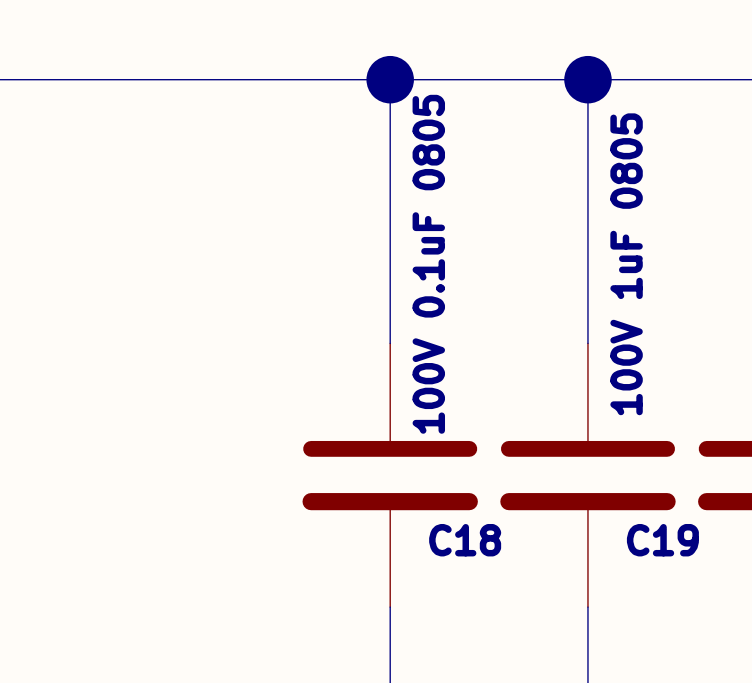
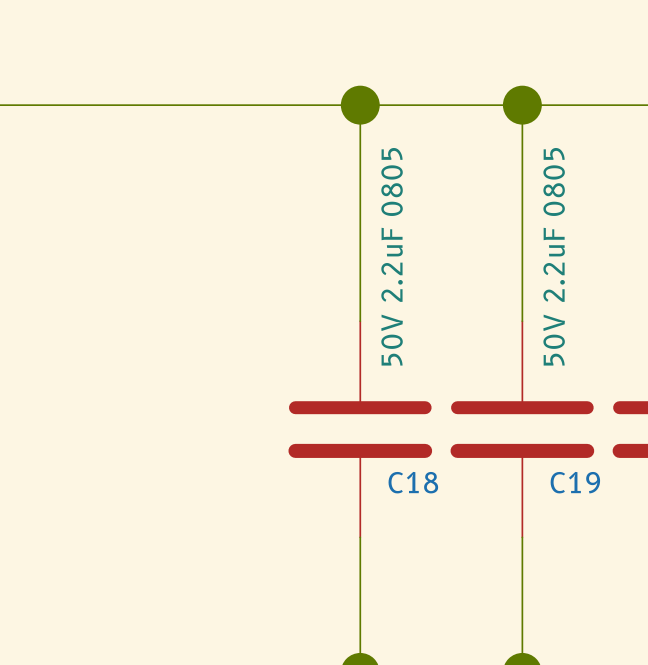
C18 value: 100V 0.1uF 0805 (428, 264) -> 50V 2.2uF 0805 (392, 256)
C19 value: 100V 1uF 0805 (626, 264) -> 50V 2.2uF 0805 (554, 256)

